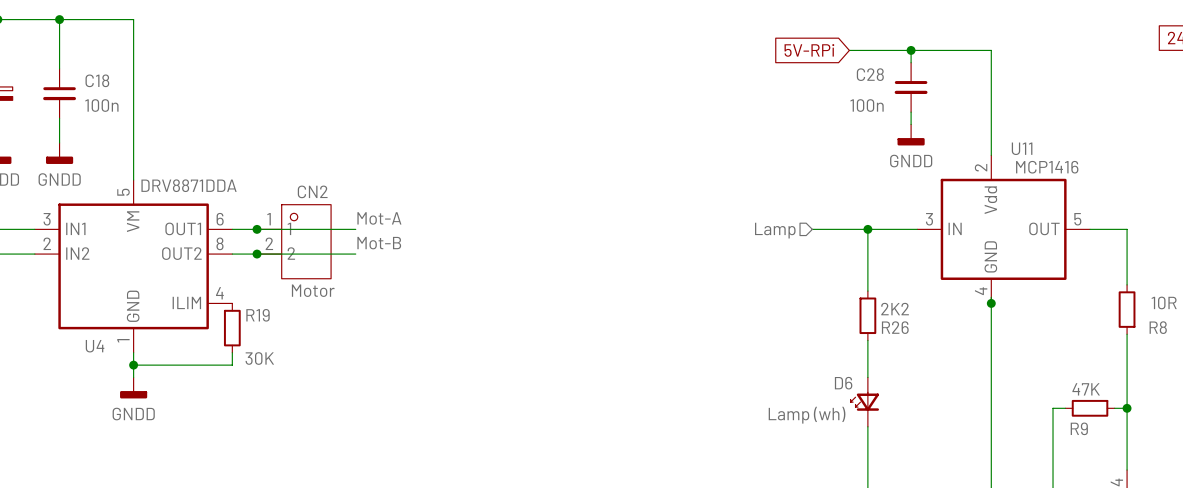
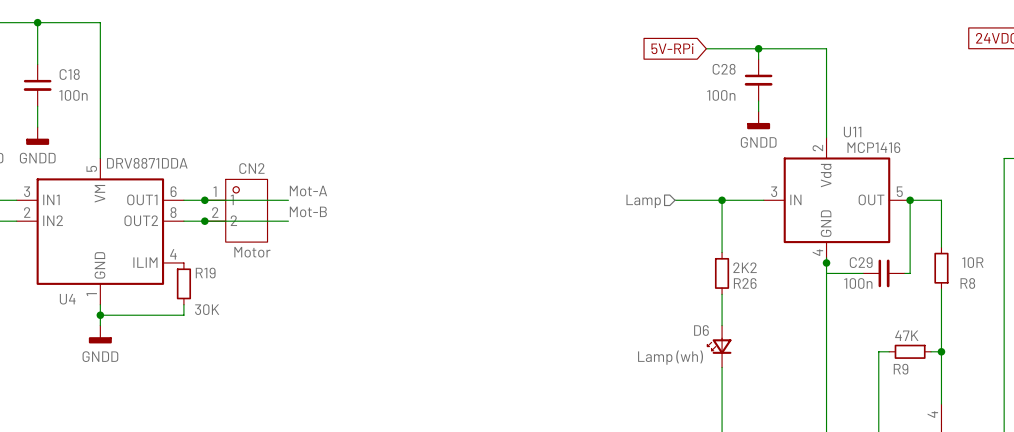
wire: none -> (910, 200) (910, 273) (904, 273)
junction: none -> (910, 200)
wire: none -> (826, 273) (863, 273)
C29: none -> 100n (883, 273)

